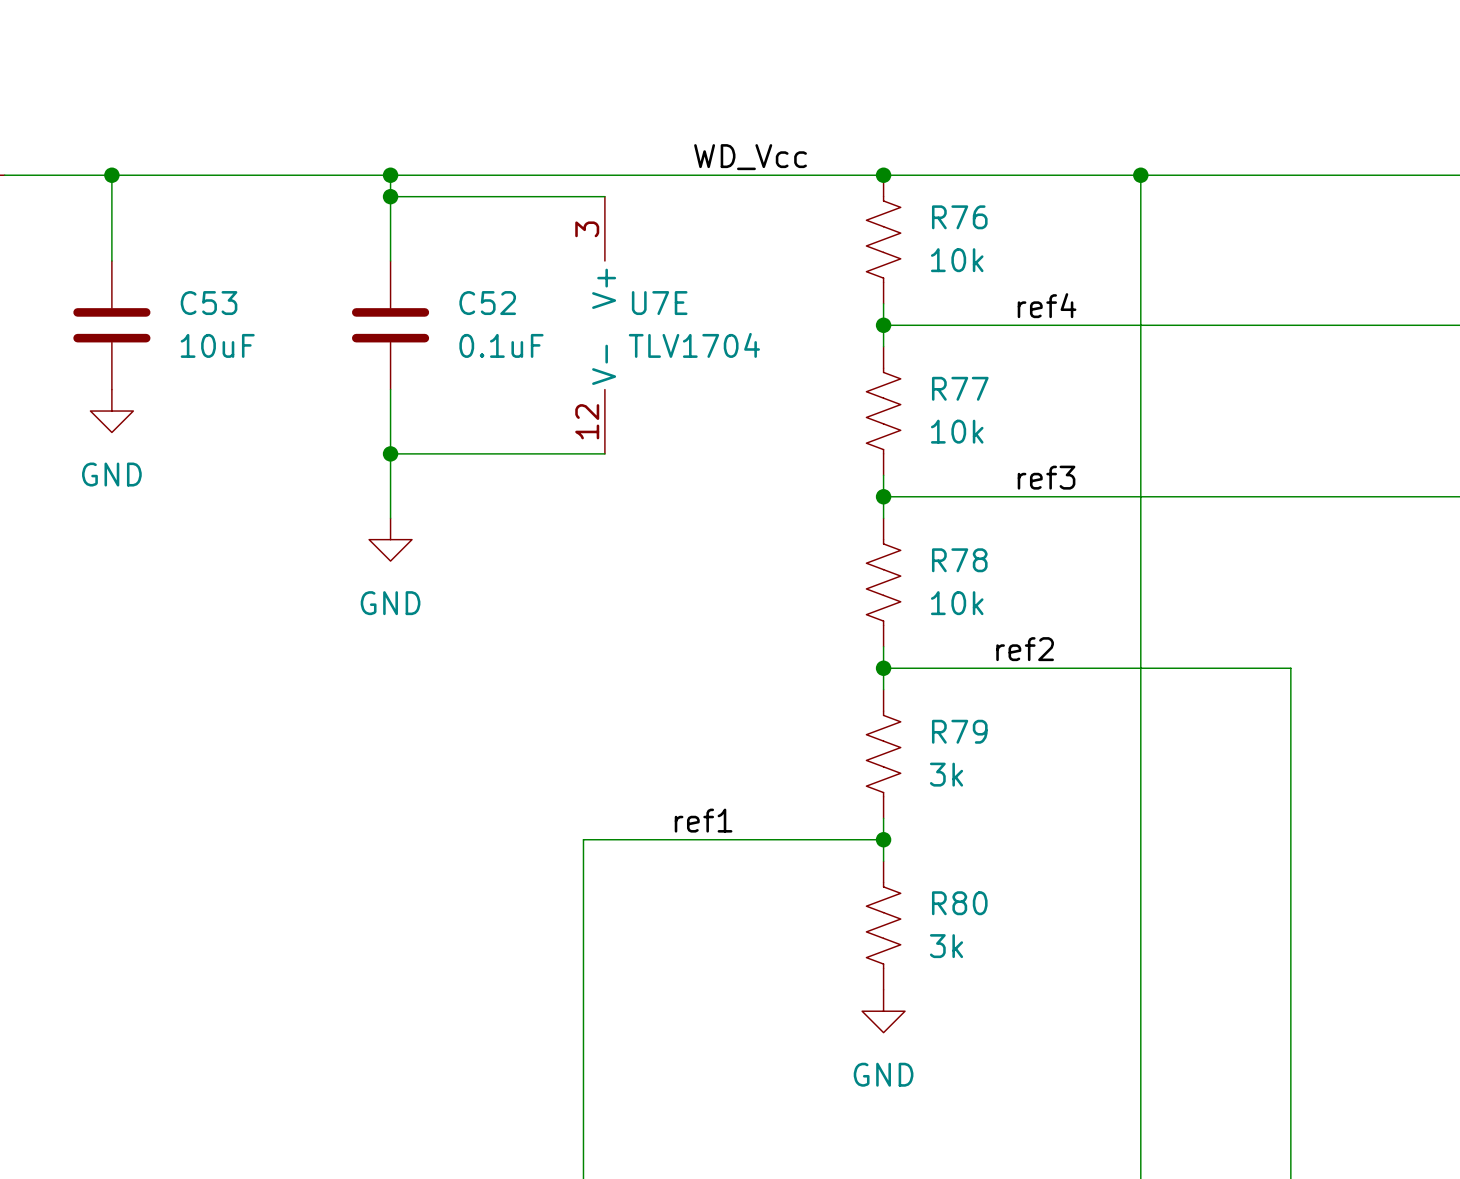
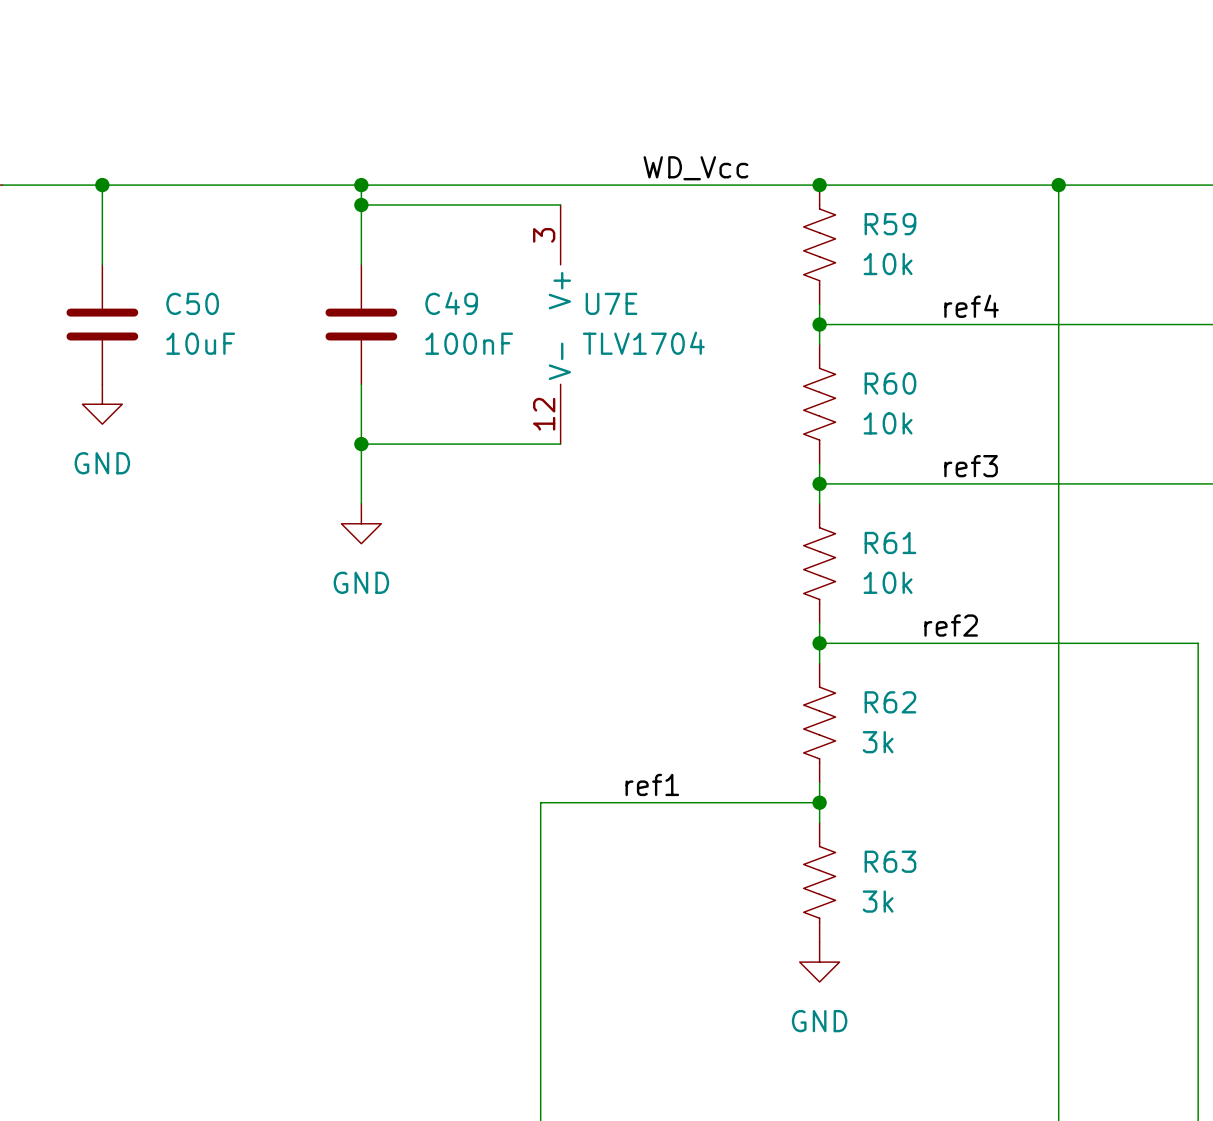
R76 name: R76 (959, 217) -> R59 (890, 224)
C53 name: C53 (209, 303) -> C50 (192, 303)
C52 name: C52 (487, 303) -> C49 (451, 303)
C52 value: 0.1uF (501, 345) -> 100nF (469, 343)
R77 name: R77 (960, 388) -> R60 (890, 383)
R78 name: R78 (959, 560) -> R61 (890, 542)
R79 name: R79 (959, 731) -> R62 (890, 702)
R80 name: R80 (959, 903) -> R63 (890, 861)

